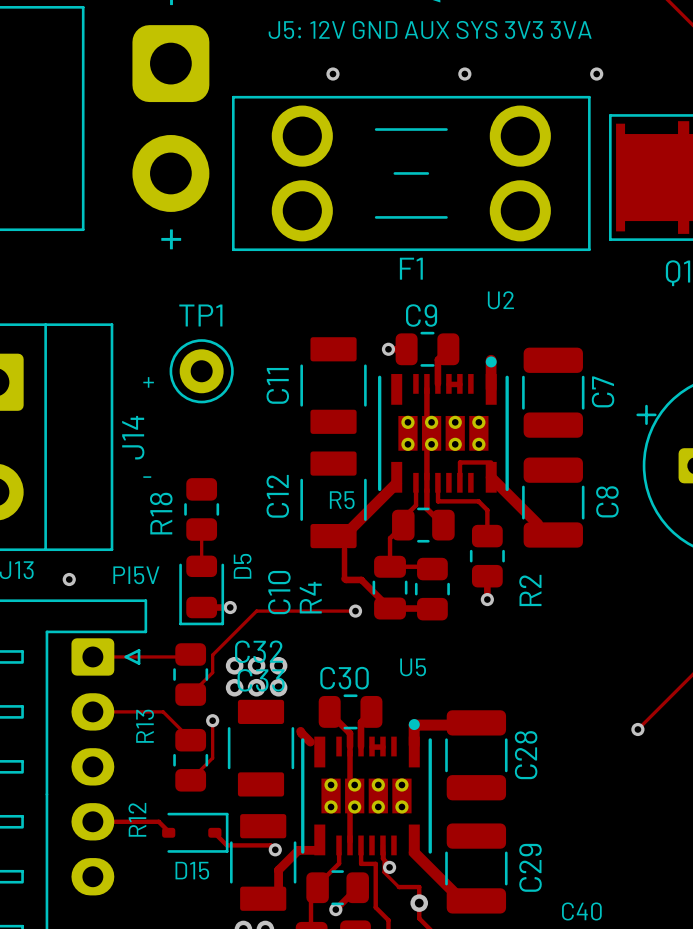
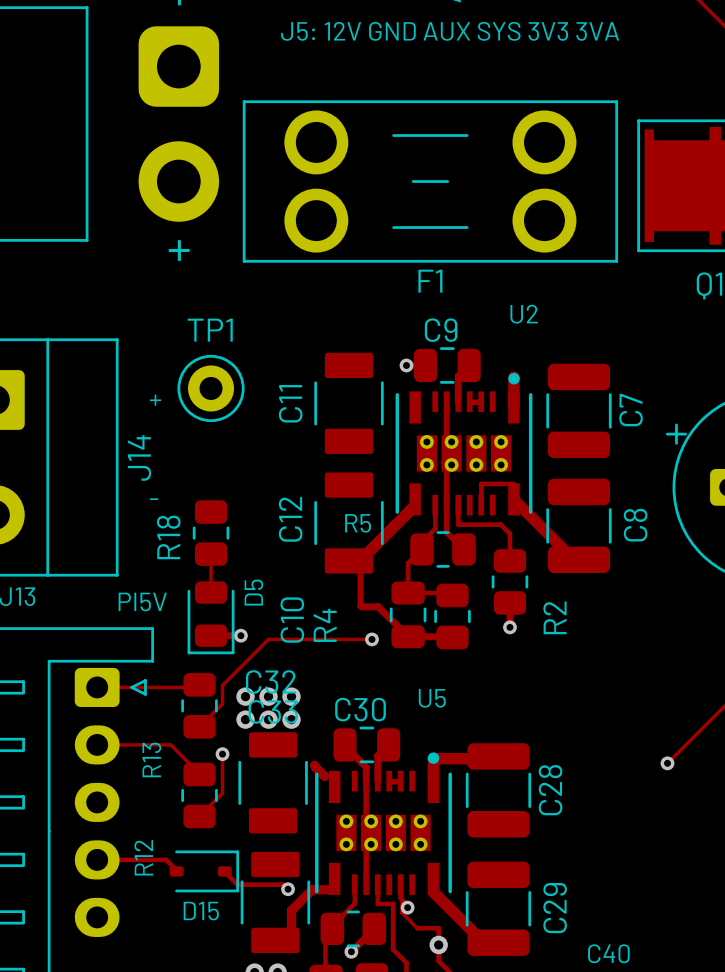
via: (332, 74) -> none
via: (464, 74) -> none
via: (596, 74) -> none
via: (69, 579) -> none

